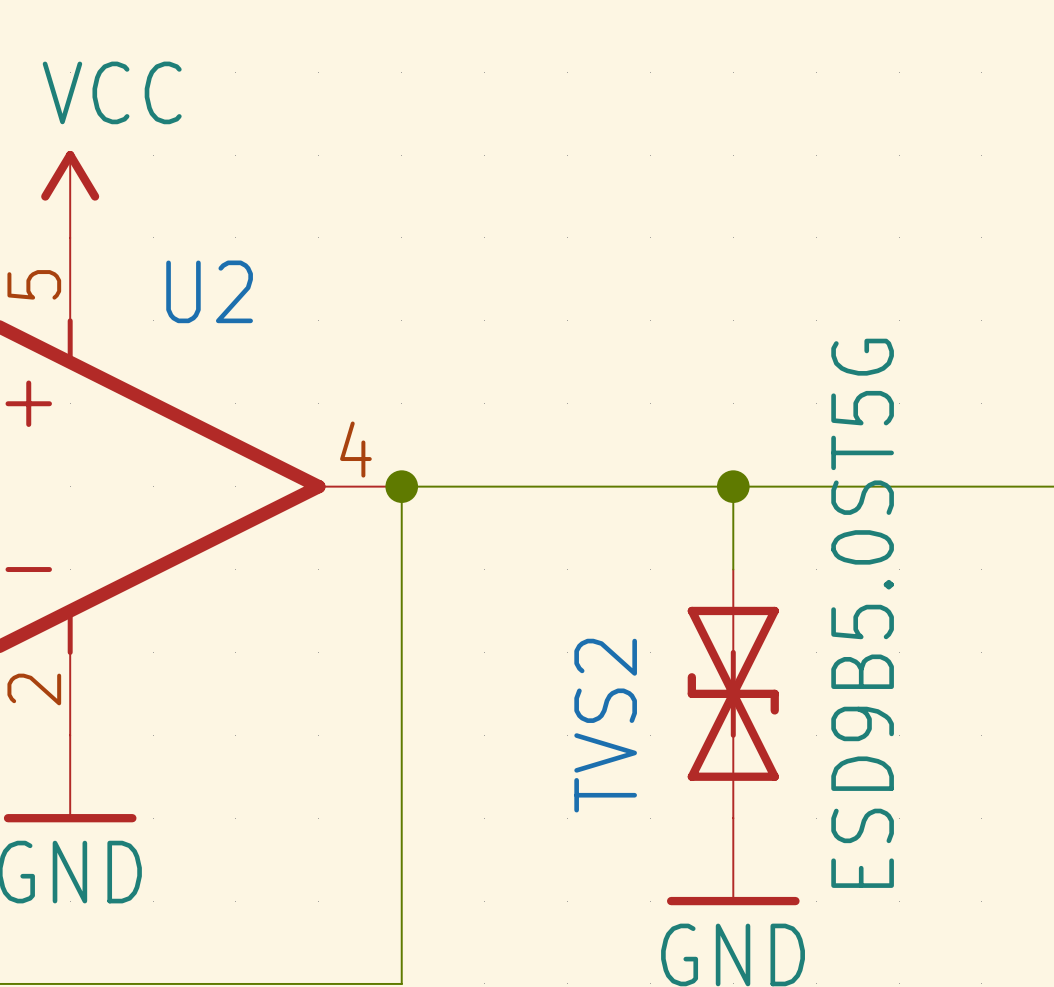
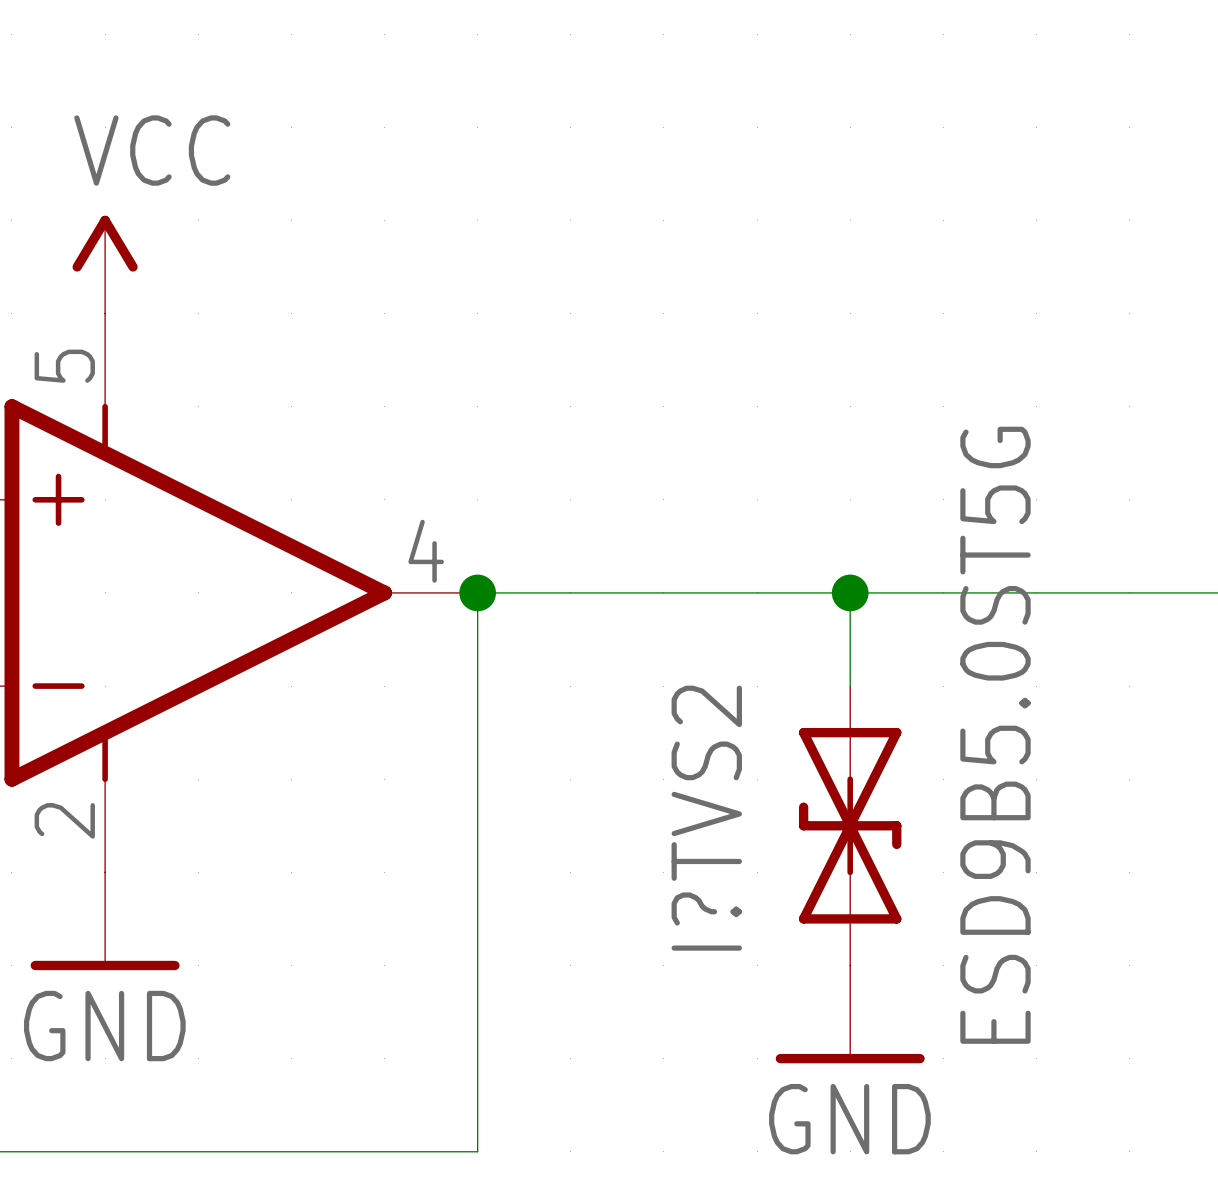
U2 name: U2 (209, 291) -> none
TVS2 name: TVS2 (605, 725) -> I?TVS2 (706, 818)

